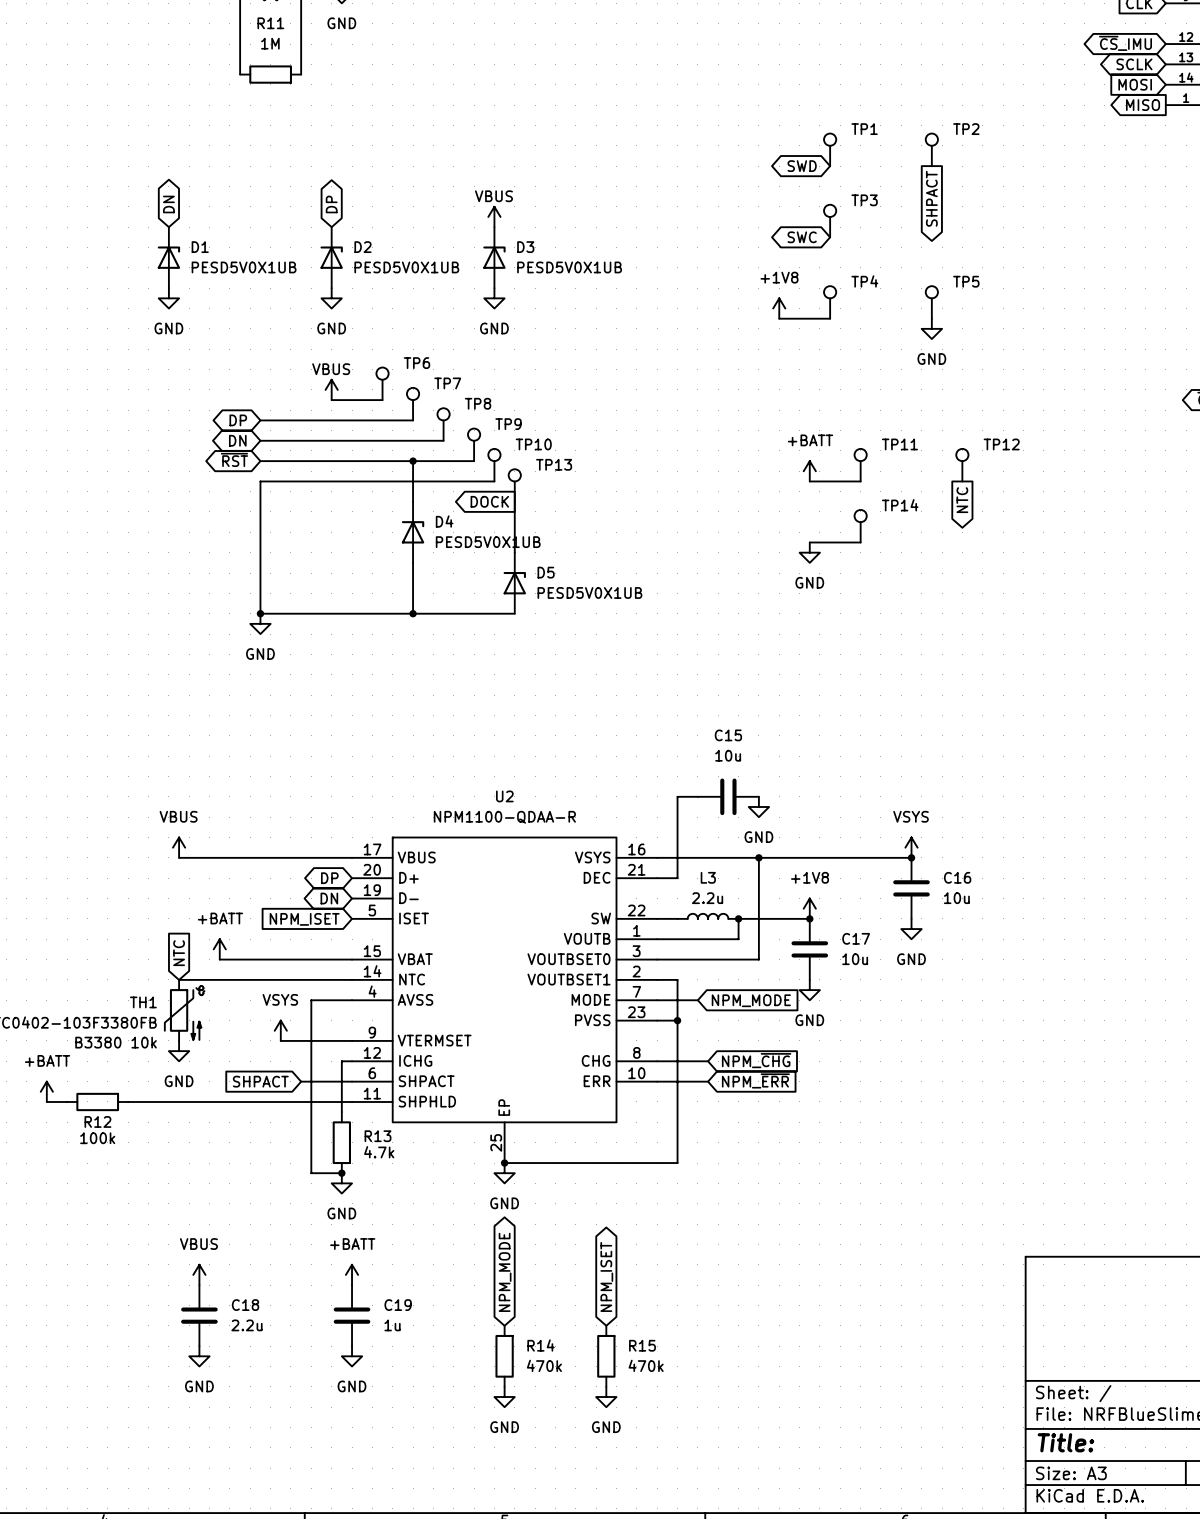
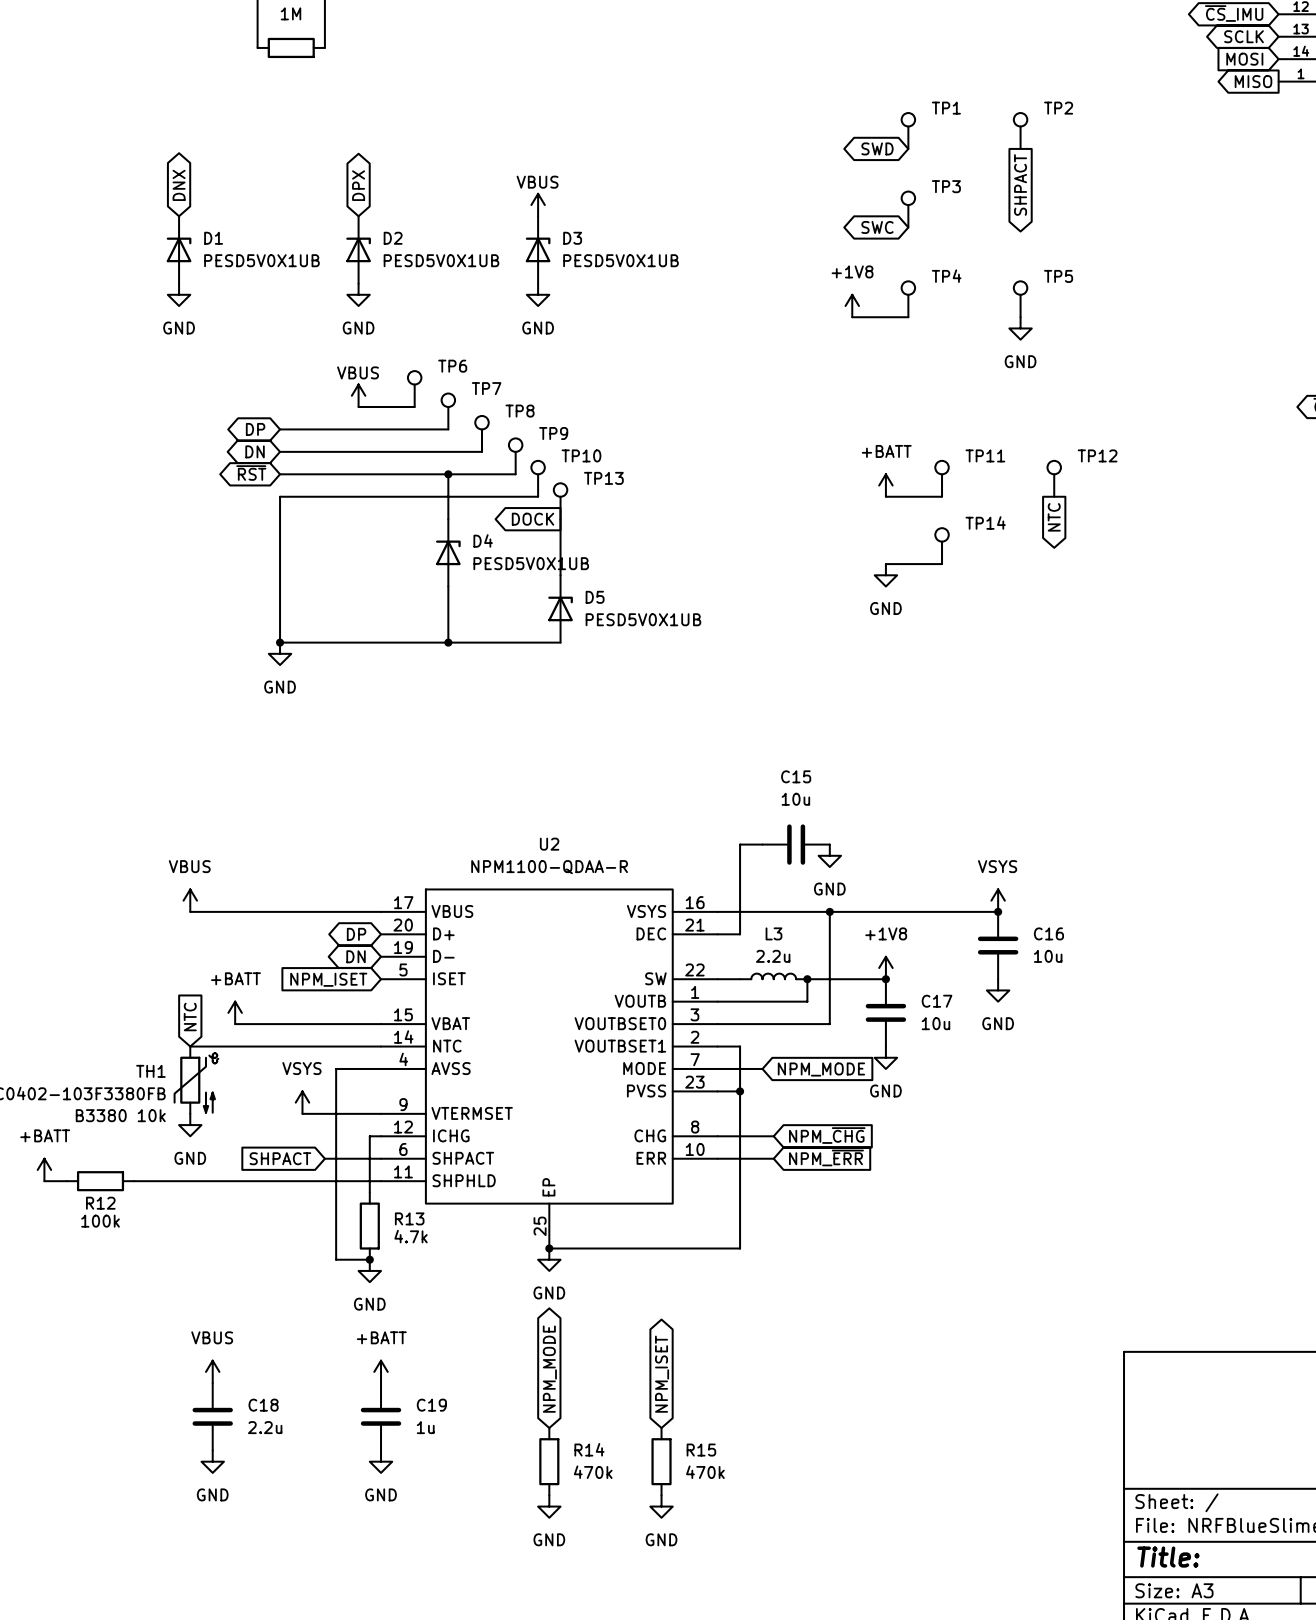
global label: DN (168, 204) -> DNX (179, 185)
global label: DP (331, 204) -> DPX (358, 185)

